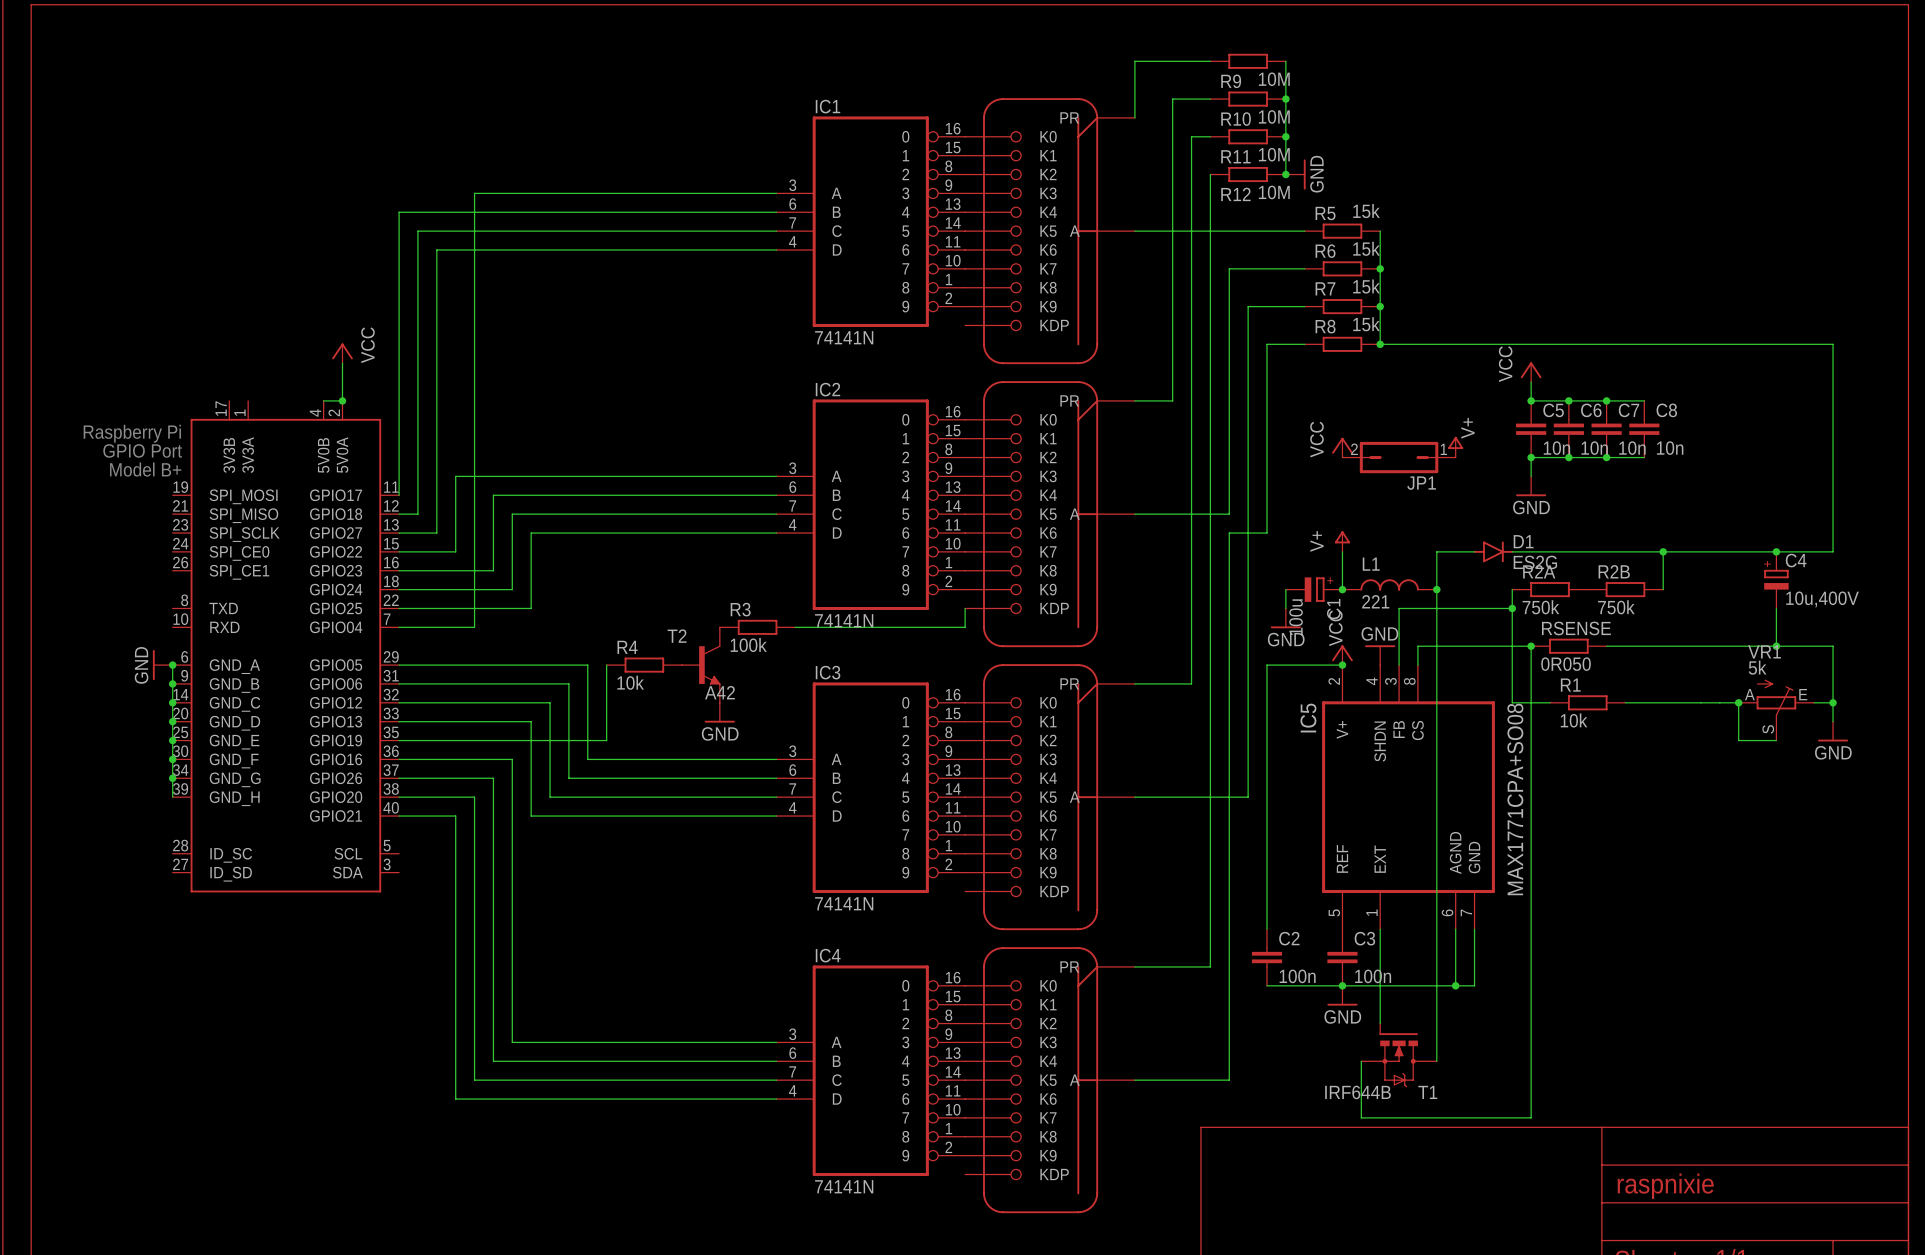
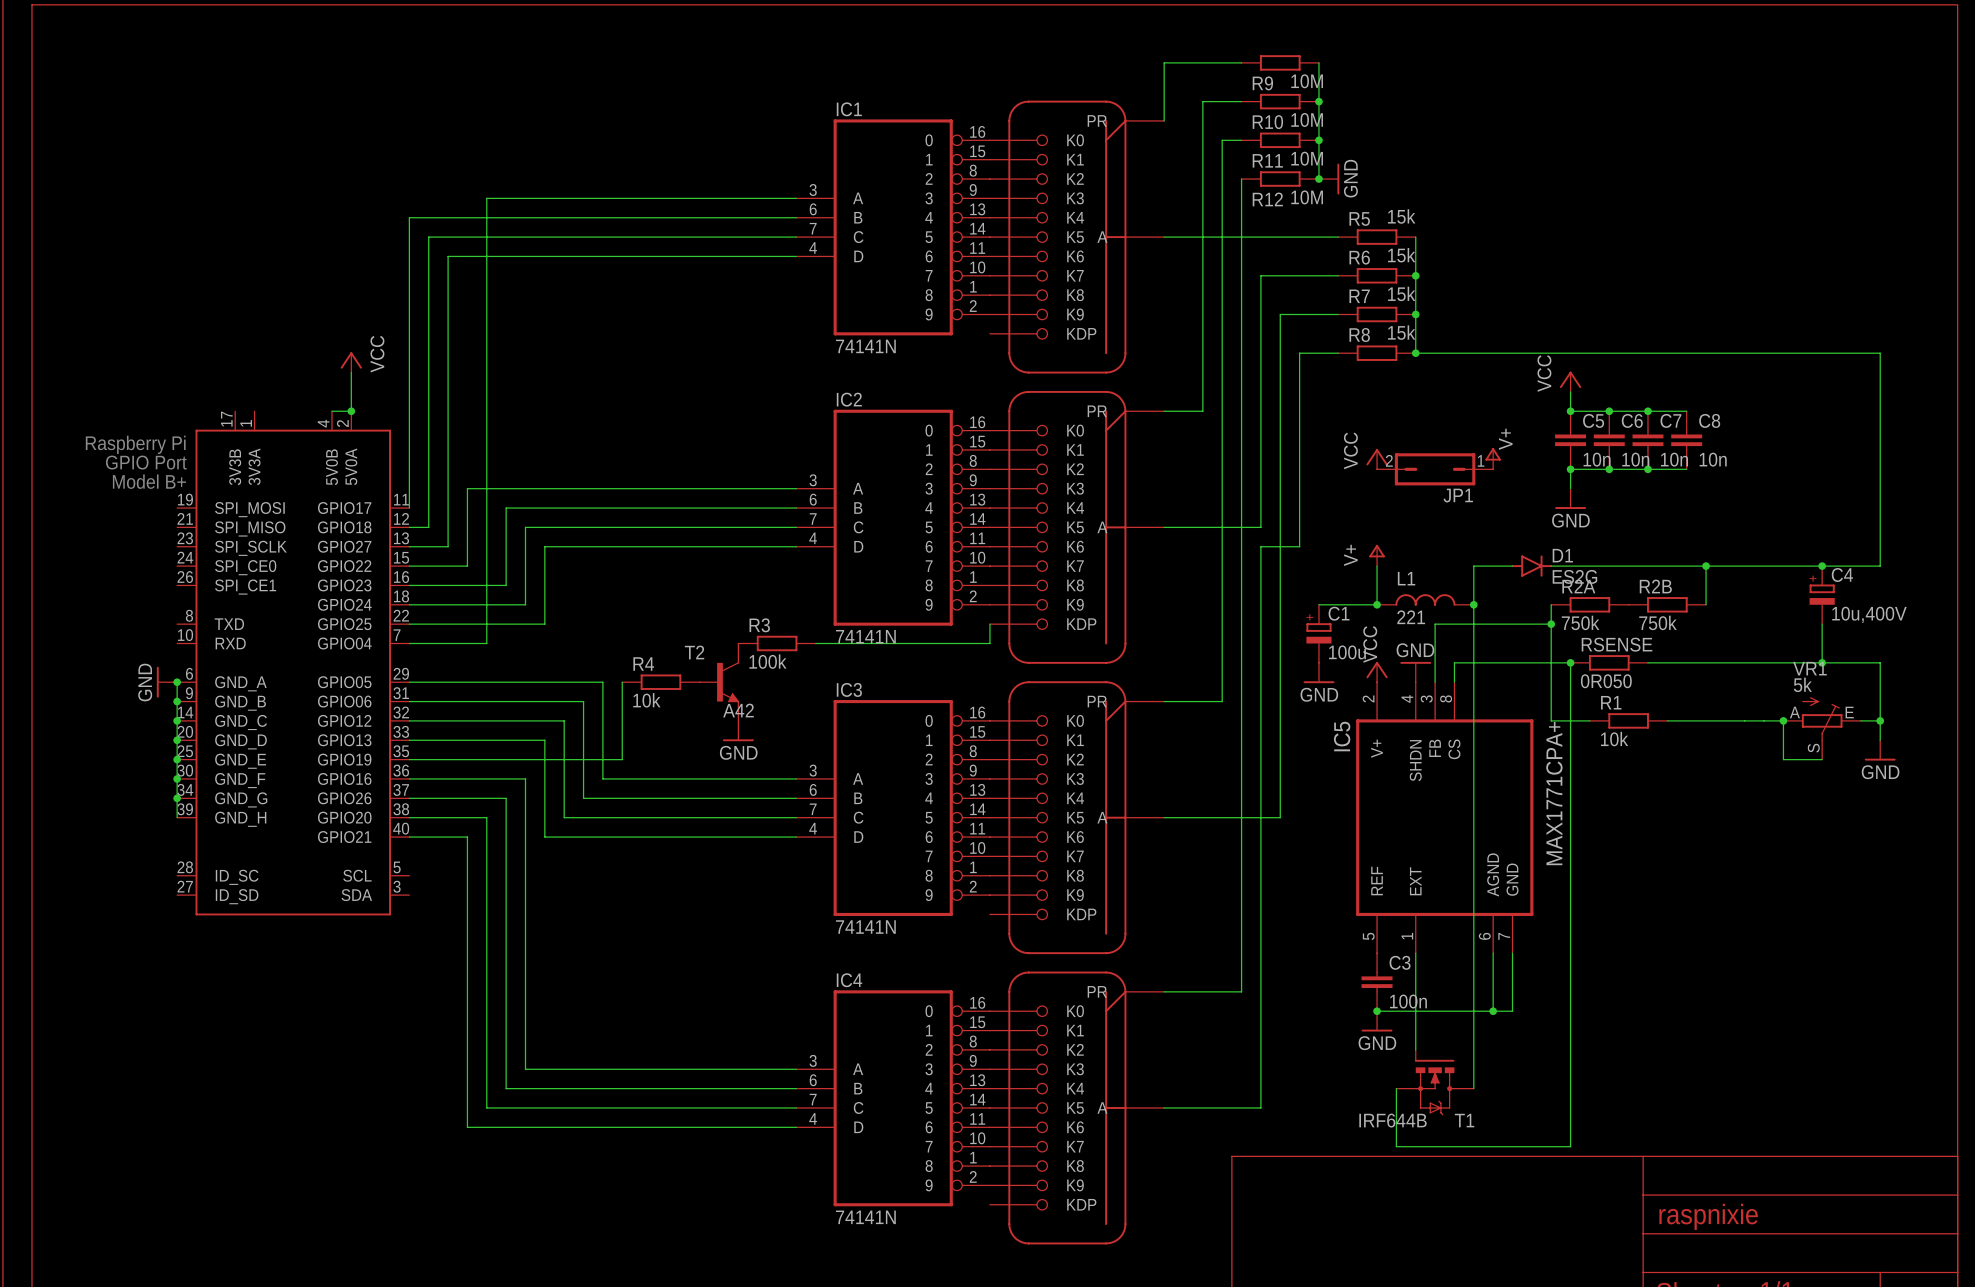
C1 rotation: 0° (1314, 589) -> 90° counterclockwise (1318, 633)
C1 position: (1314, 589) -> (1318, 633)
power symbol position: GND (1285, 618) -> GND (1318, 673)
wire: (1342, 665) (1266, 665) (1266, 929) -> none
junction: (1342, 665) -> none
IC5 value: MAX1771CPA+SO08 (1515, 799) -> MAX1771CPA+ (1554, 793)
C2: 100n (1266, 957) -> none
wire: (1266, 985) (1342, 985) -> none

